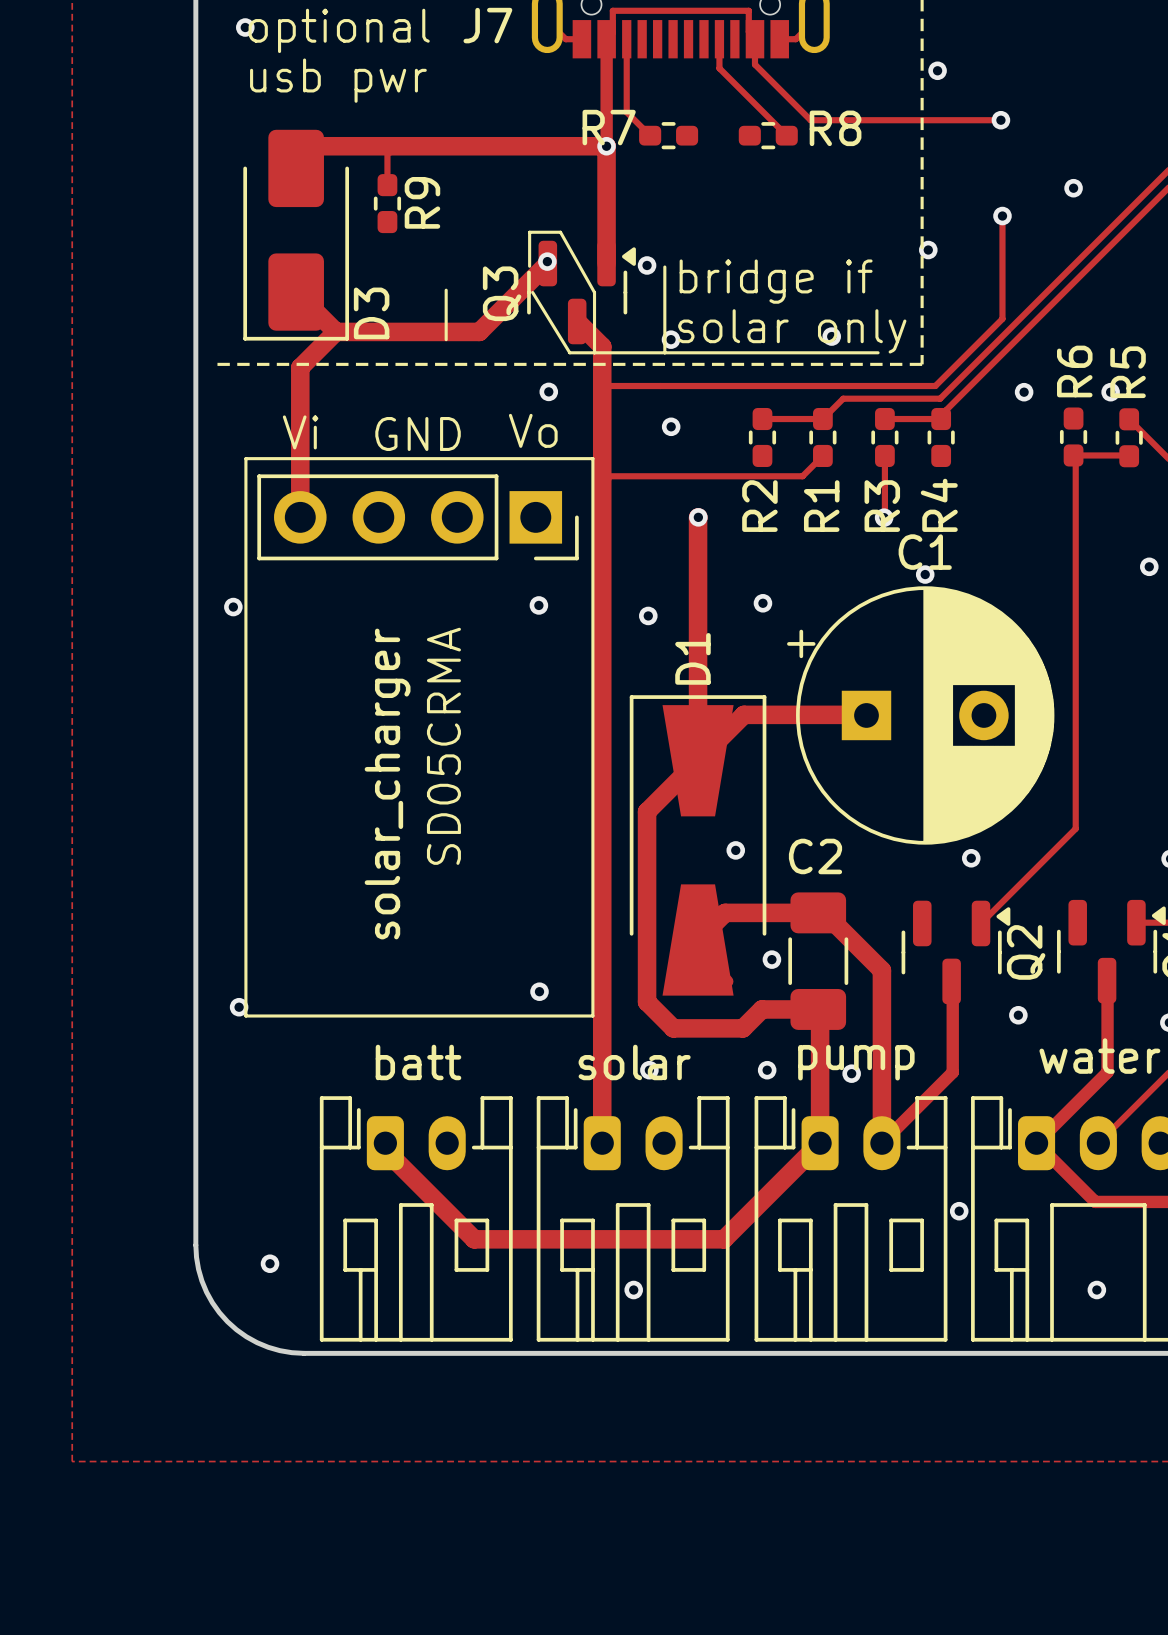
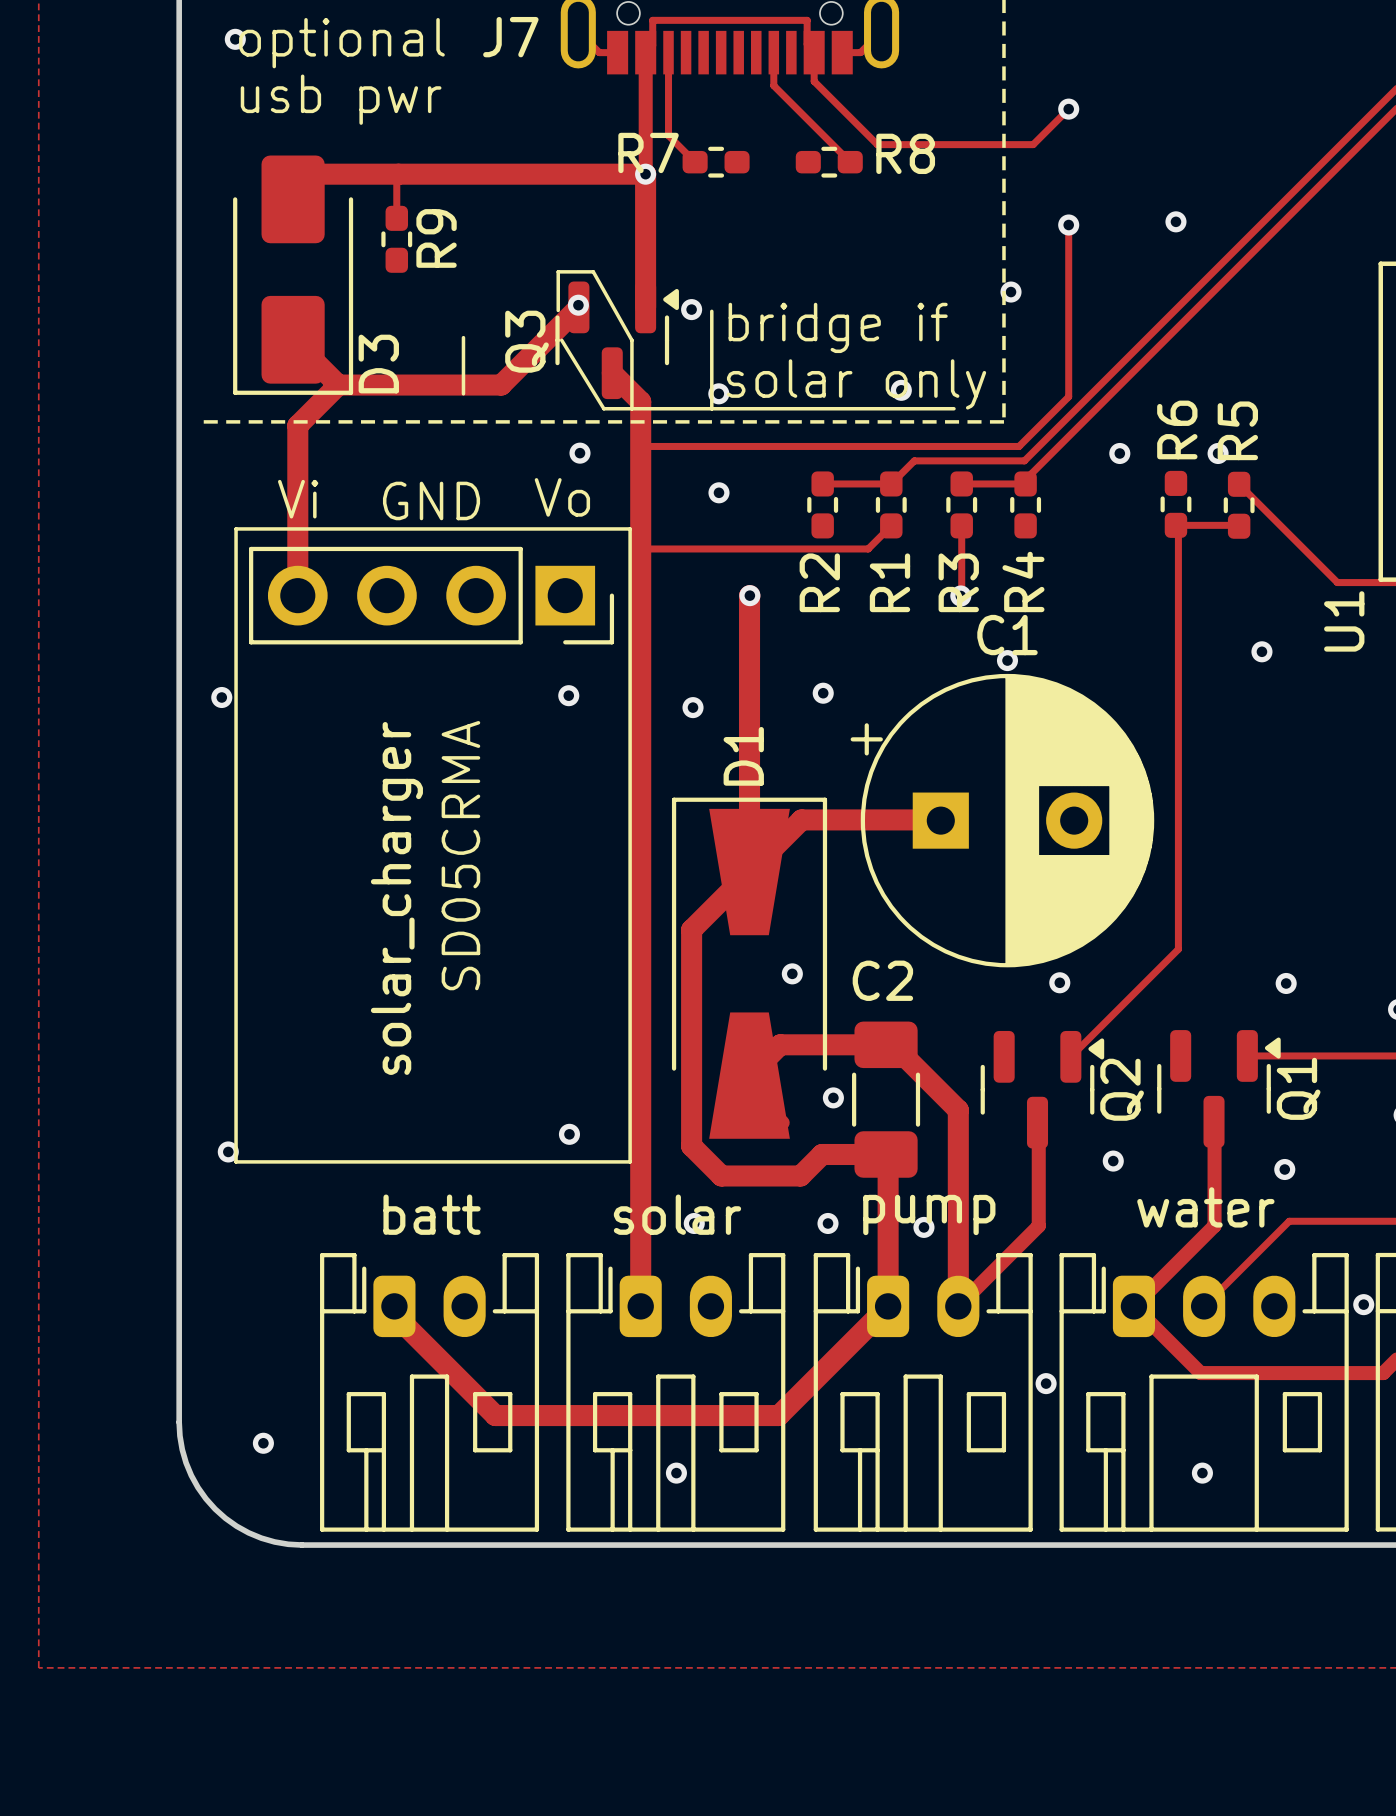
via: (937, 70) -> none
via: none -> (1068, 109)
track: (947, 120) (1002, 120) -> (1033, 144) (1068, 109)
via: (1000, 120) -> none
track: (1002, 216) (1002, 318) (979, 342) -> (1068, 225) (1068, 396)
via position: (1002, 216) -> (1068, 225)

